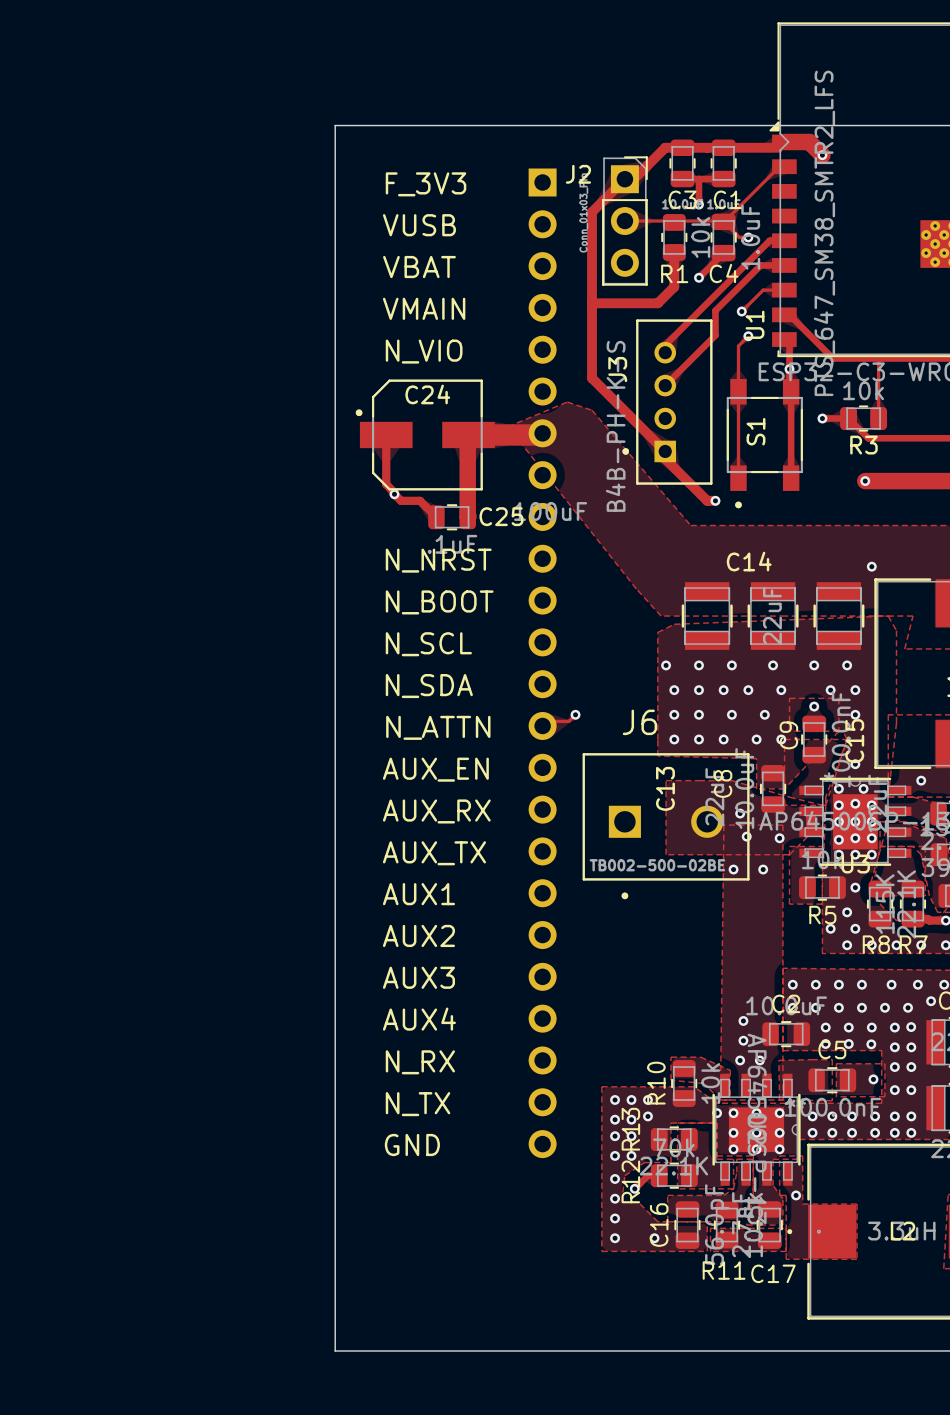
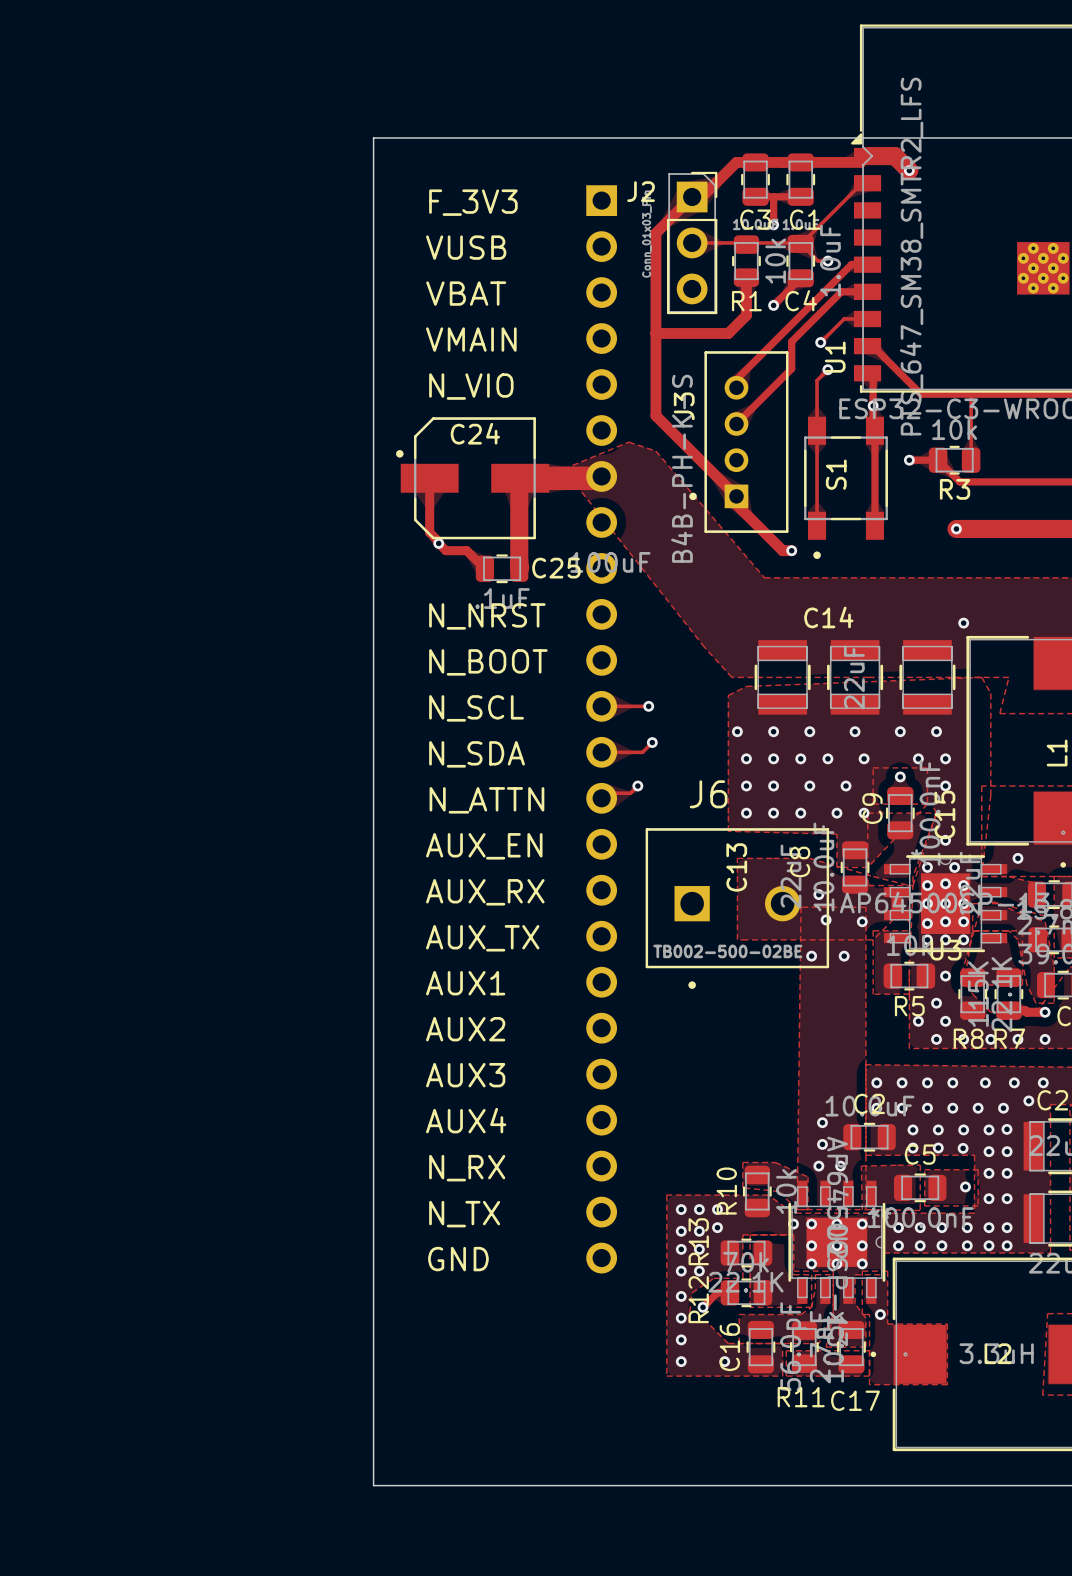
track: none -> (601, 706) (648, 706)
via: none -> (648, 706)
track: none -> (652, 742) (642, 752) (601, 752)
via: none -> (652, 742)

